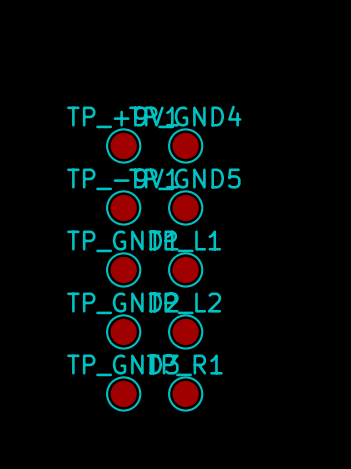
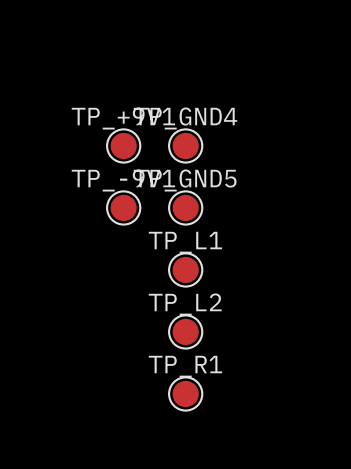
TP_GND1: (123, 269) -> none
TP_GND2: (123, 331) -> none
TP_GND3: (123, 393) -> none

